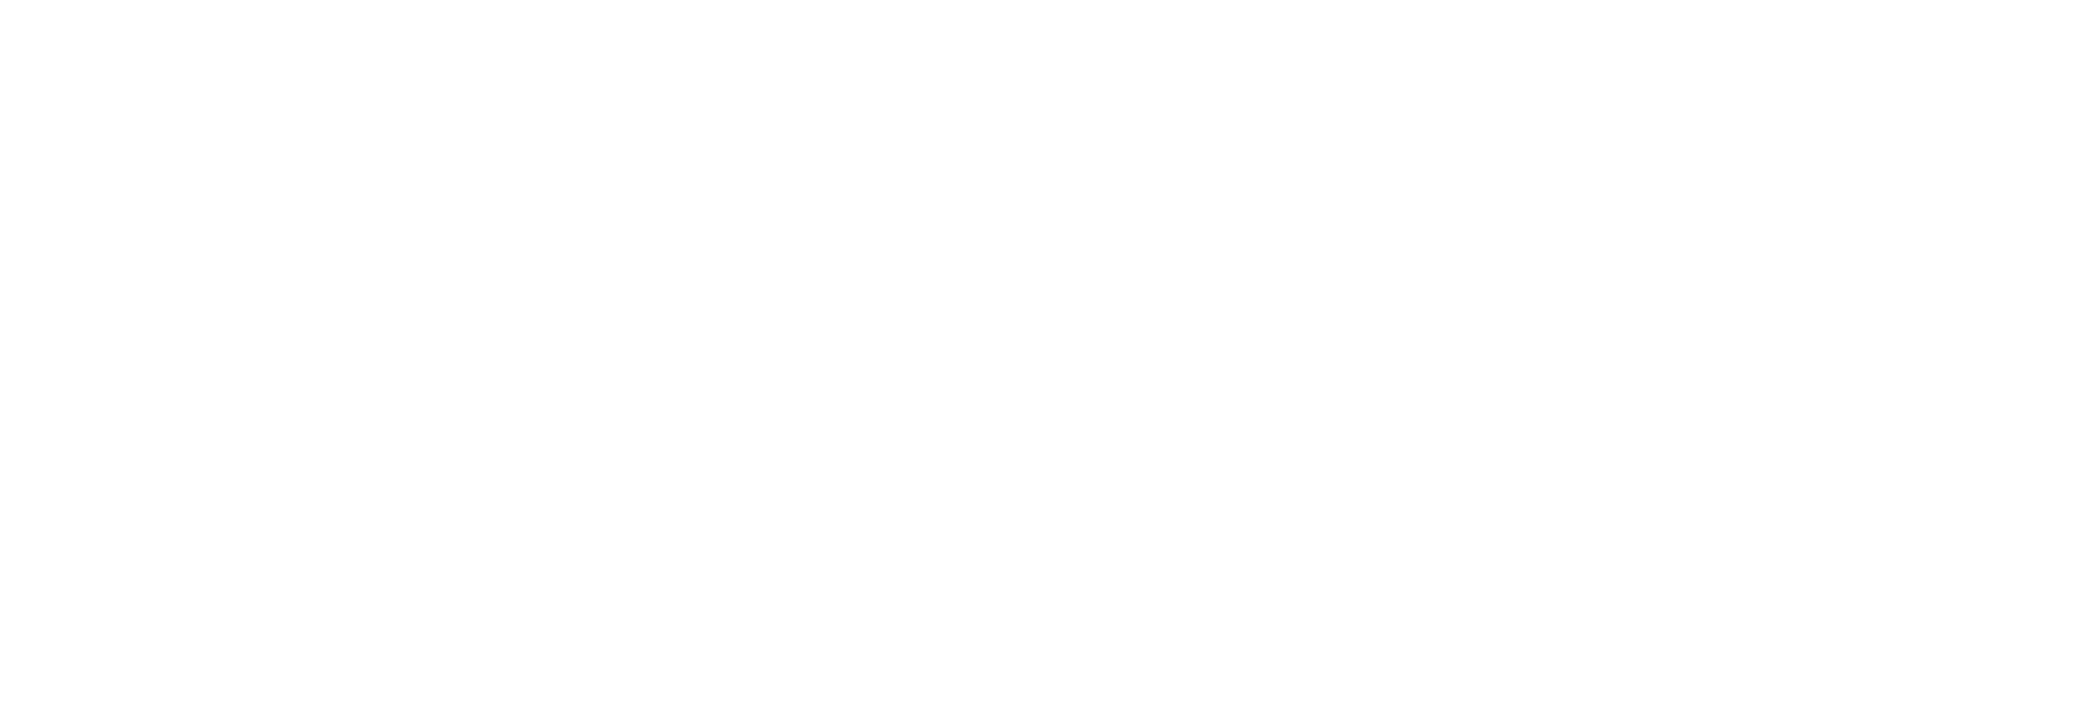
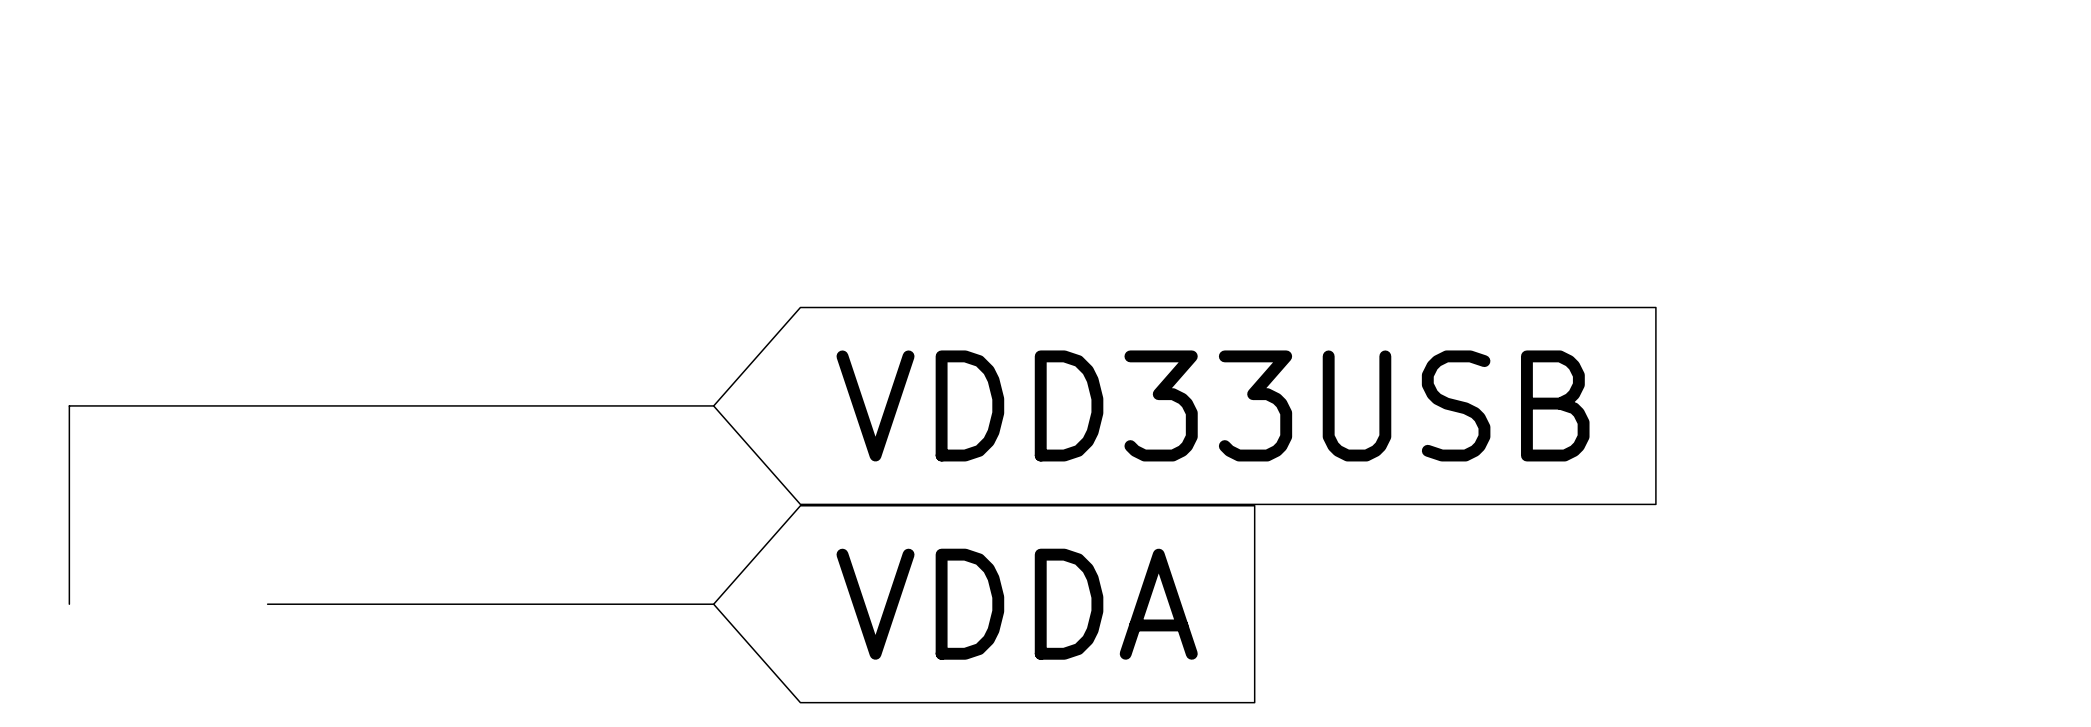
wire: none -> (713, 405) (69, 405) (69, 604)
global label: none -> VDD33USB (1213, 405)
wire: none -> (267, 604) (713, 604)
global label: none -> VDDA (1017, 604)

